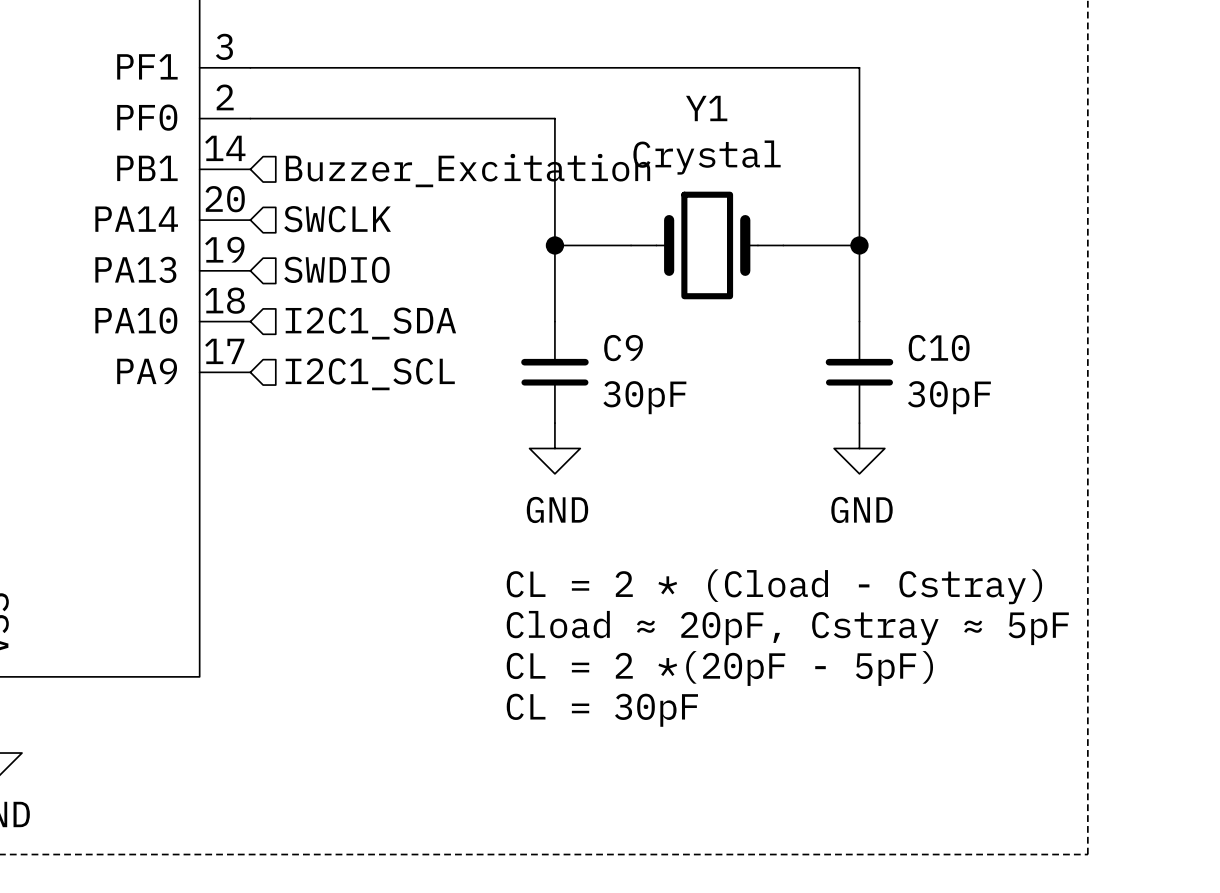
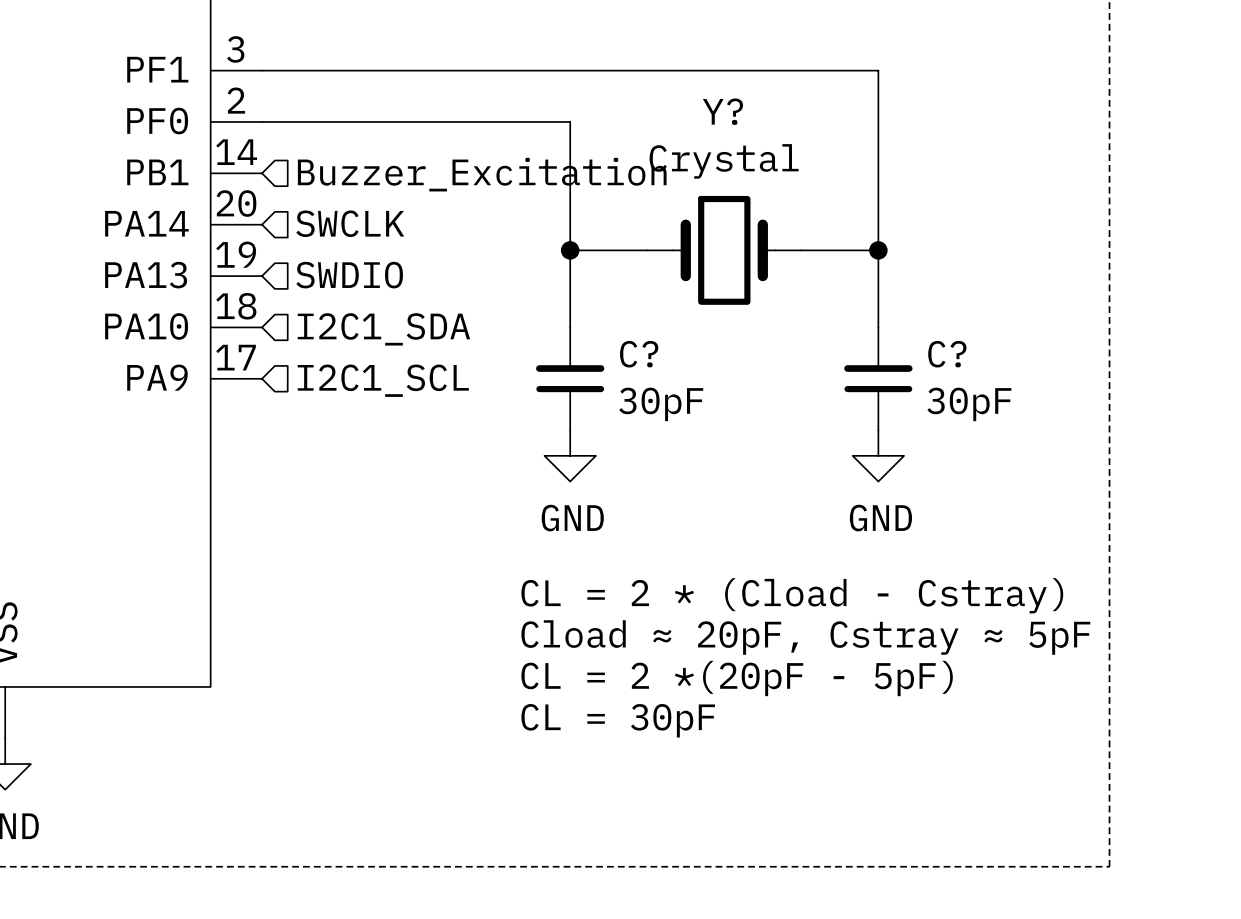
Y1 name: Y1 (706, 108) -> Y? (722, 111)
C9 name: C9 (623, 348) -> C? (639, 354)
C10 name: C10 (939, 348) -> C? (947, 354)

